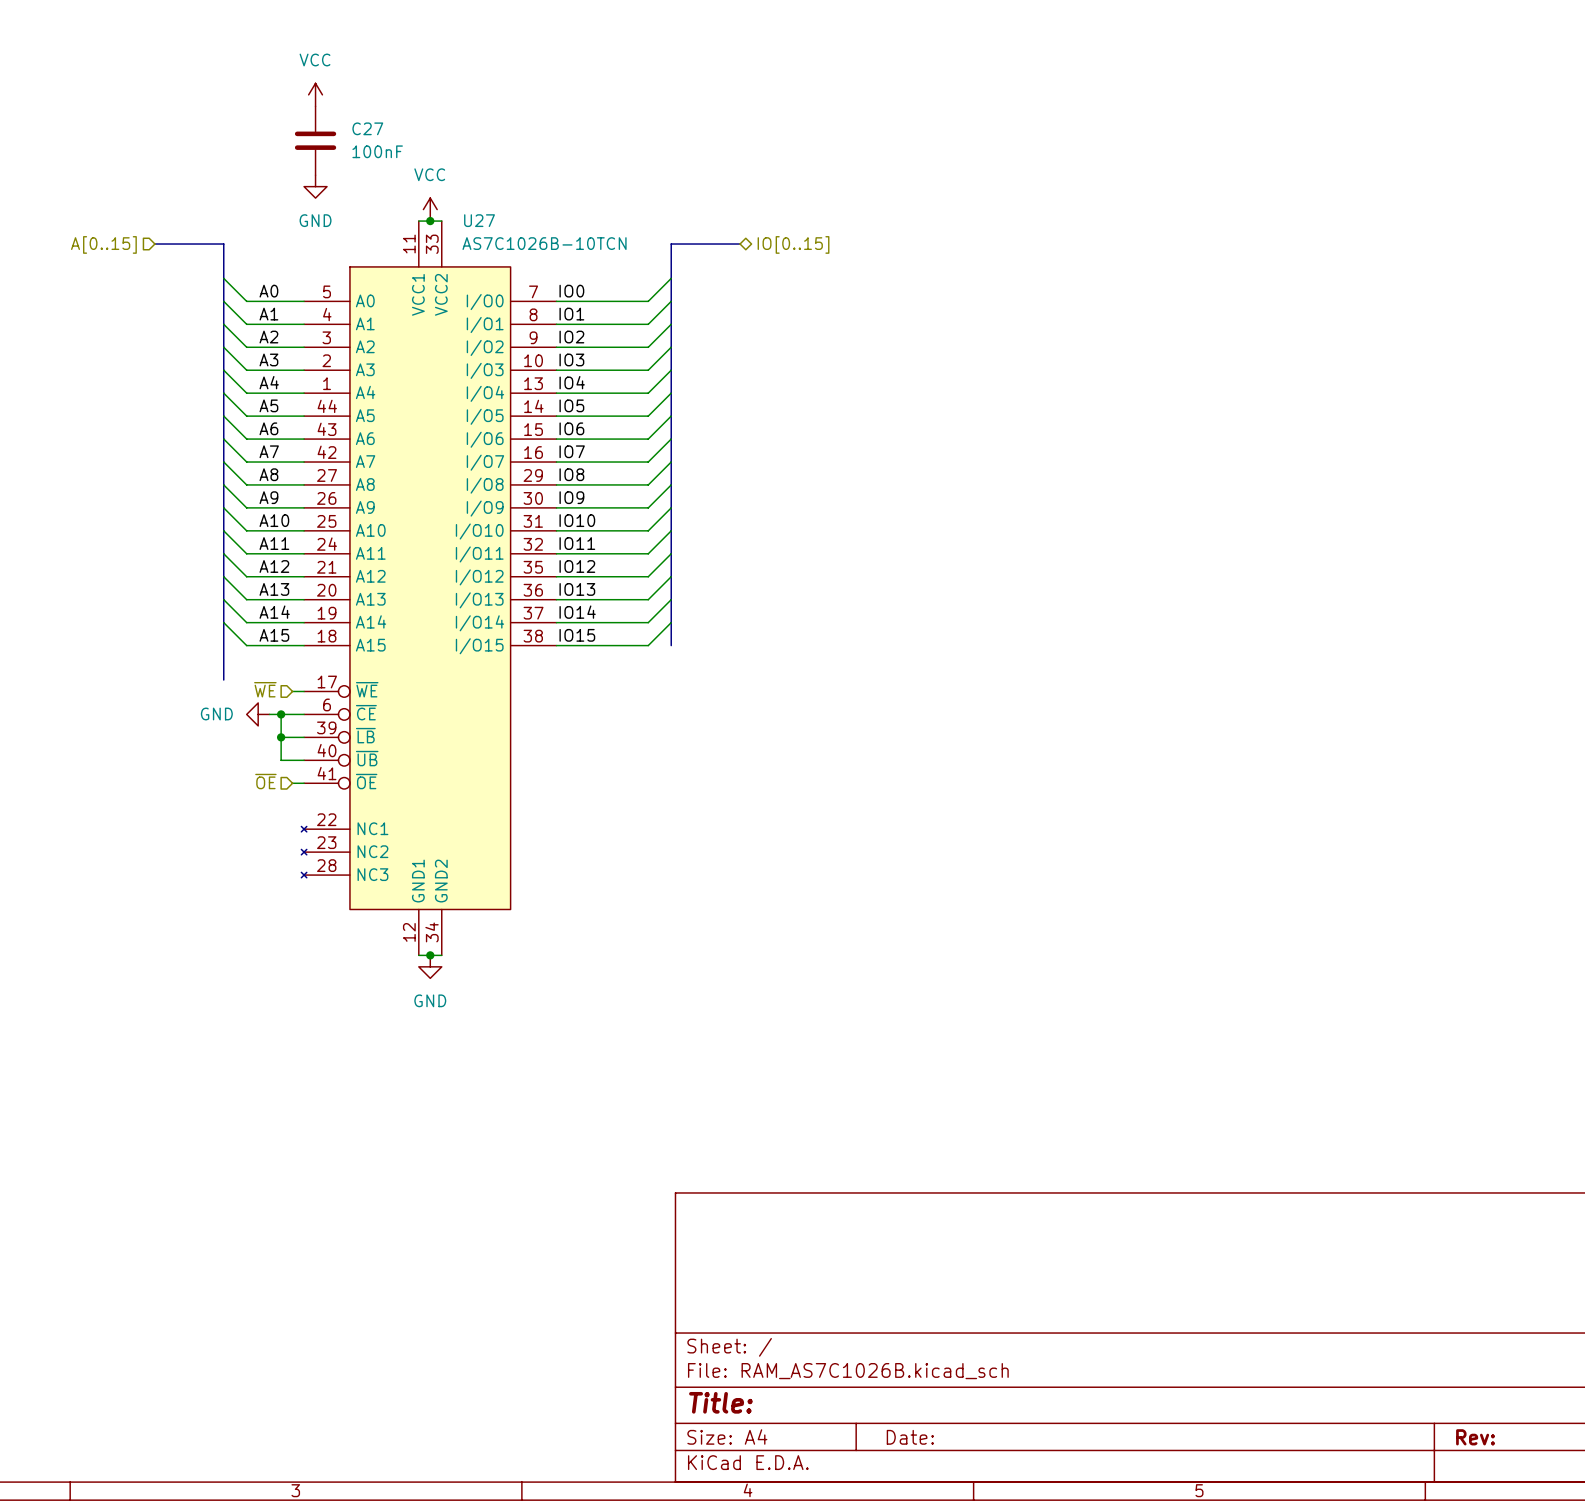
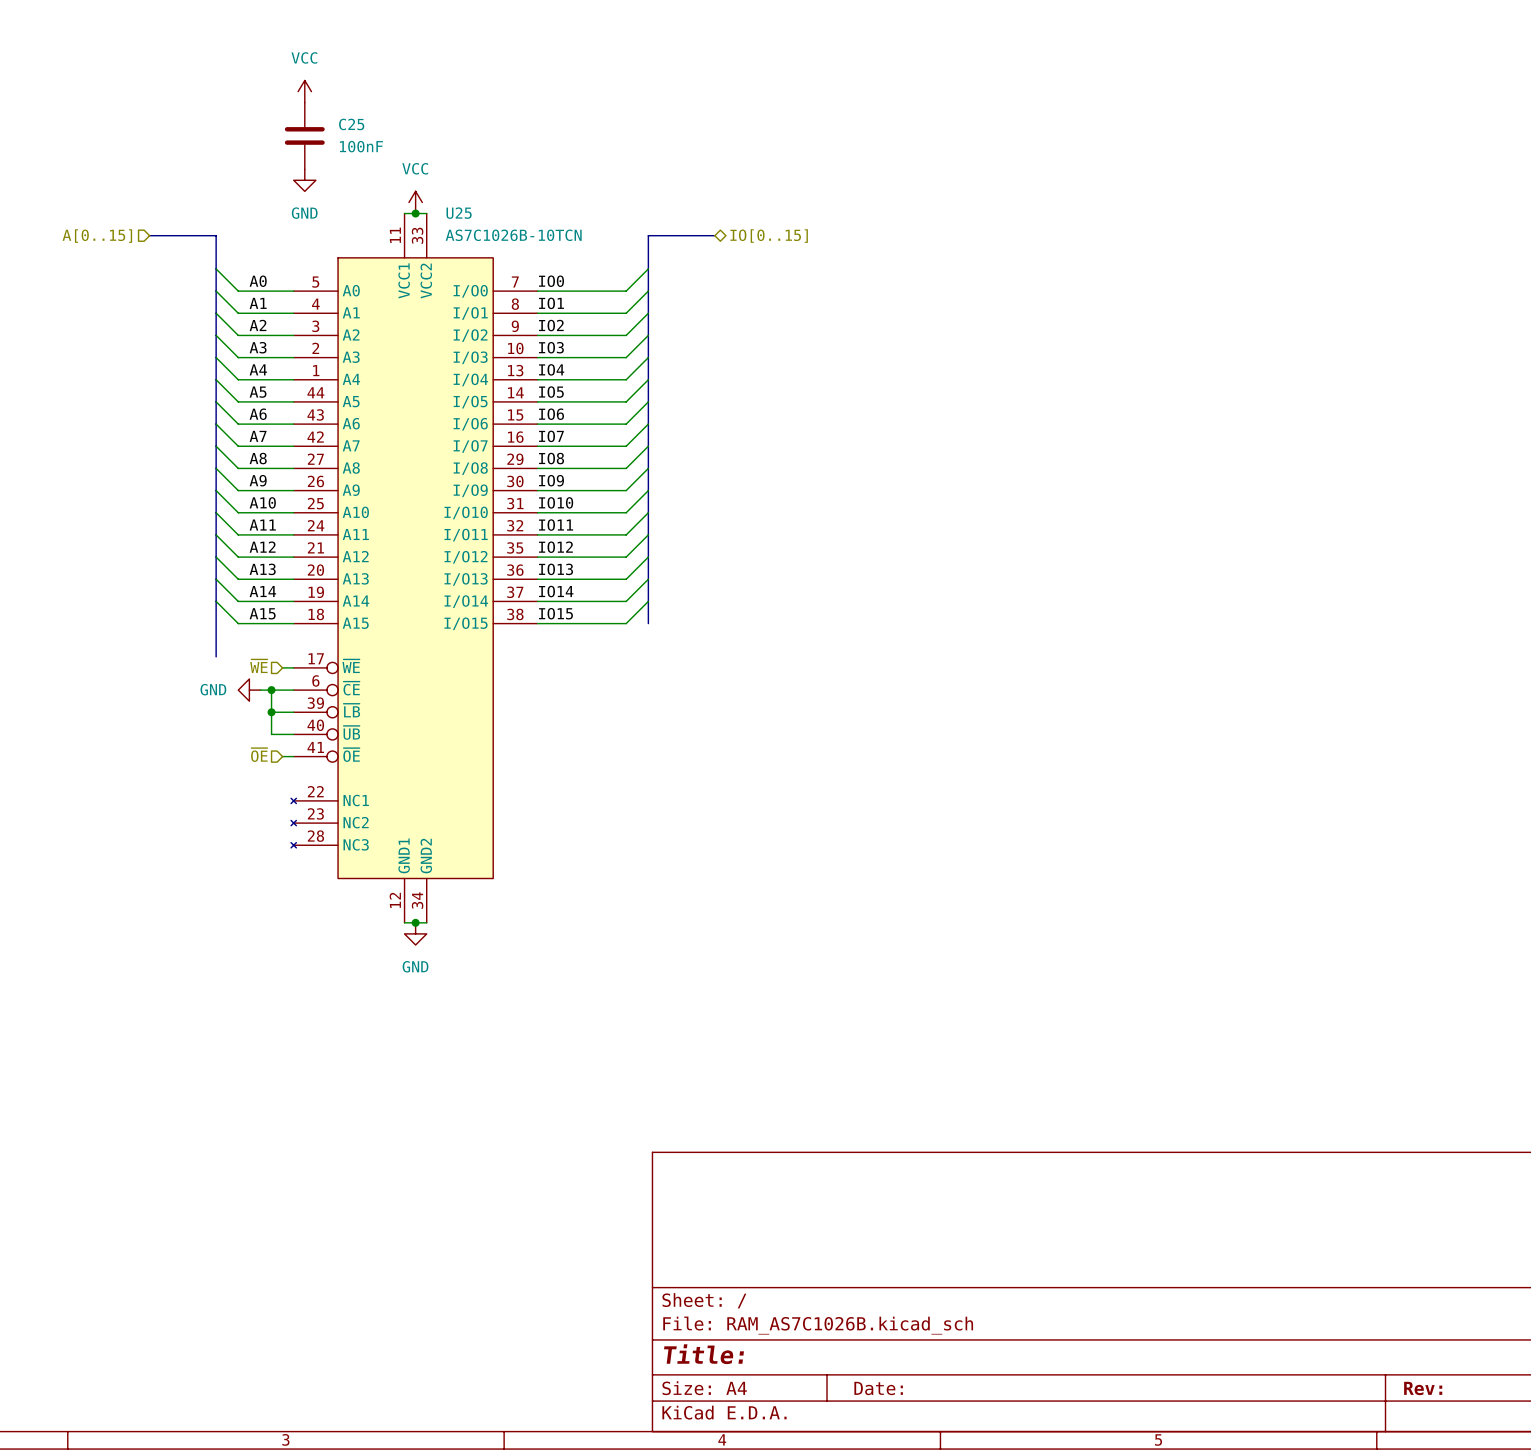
C27 name: C27 (367, 128) -> C25 (351, 124)
U27 name: U27 (479, 220) -> U25 (459, 213)

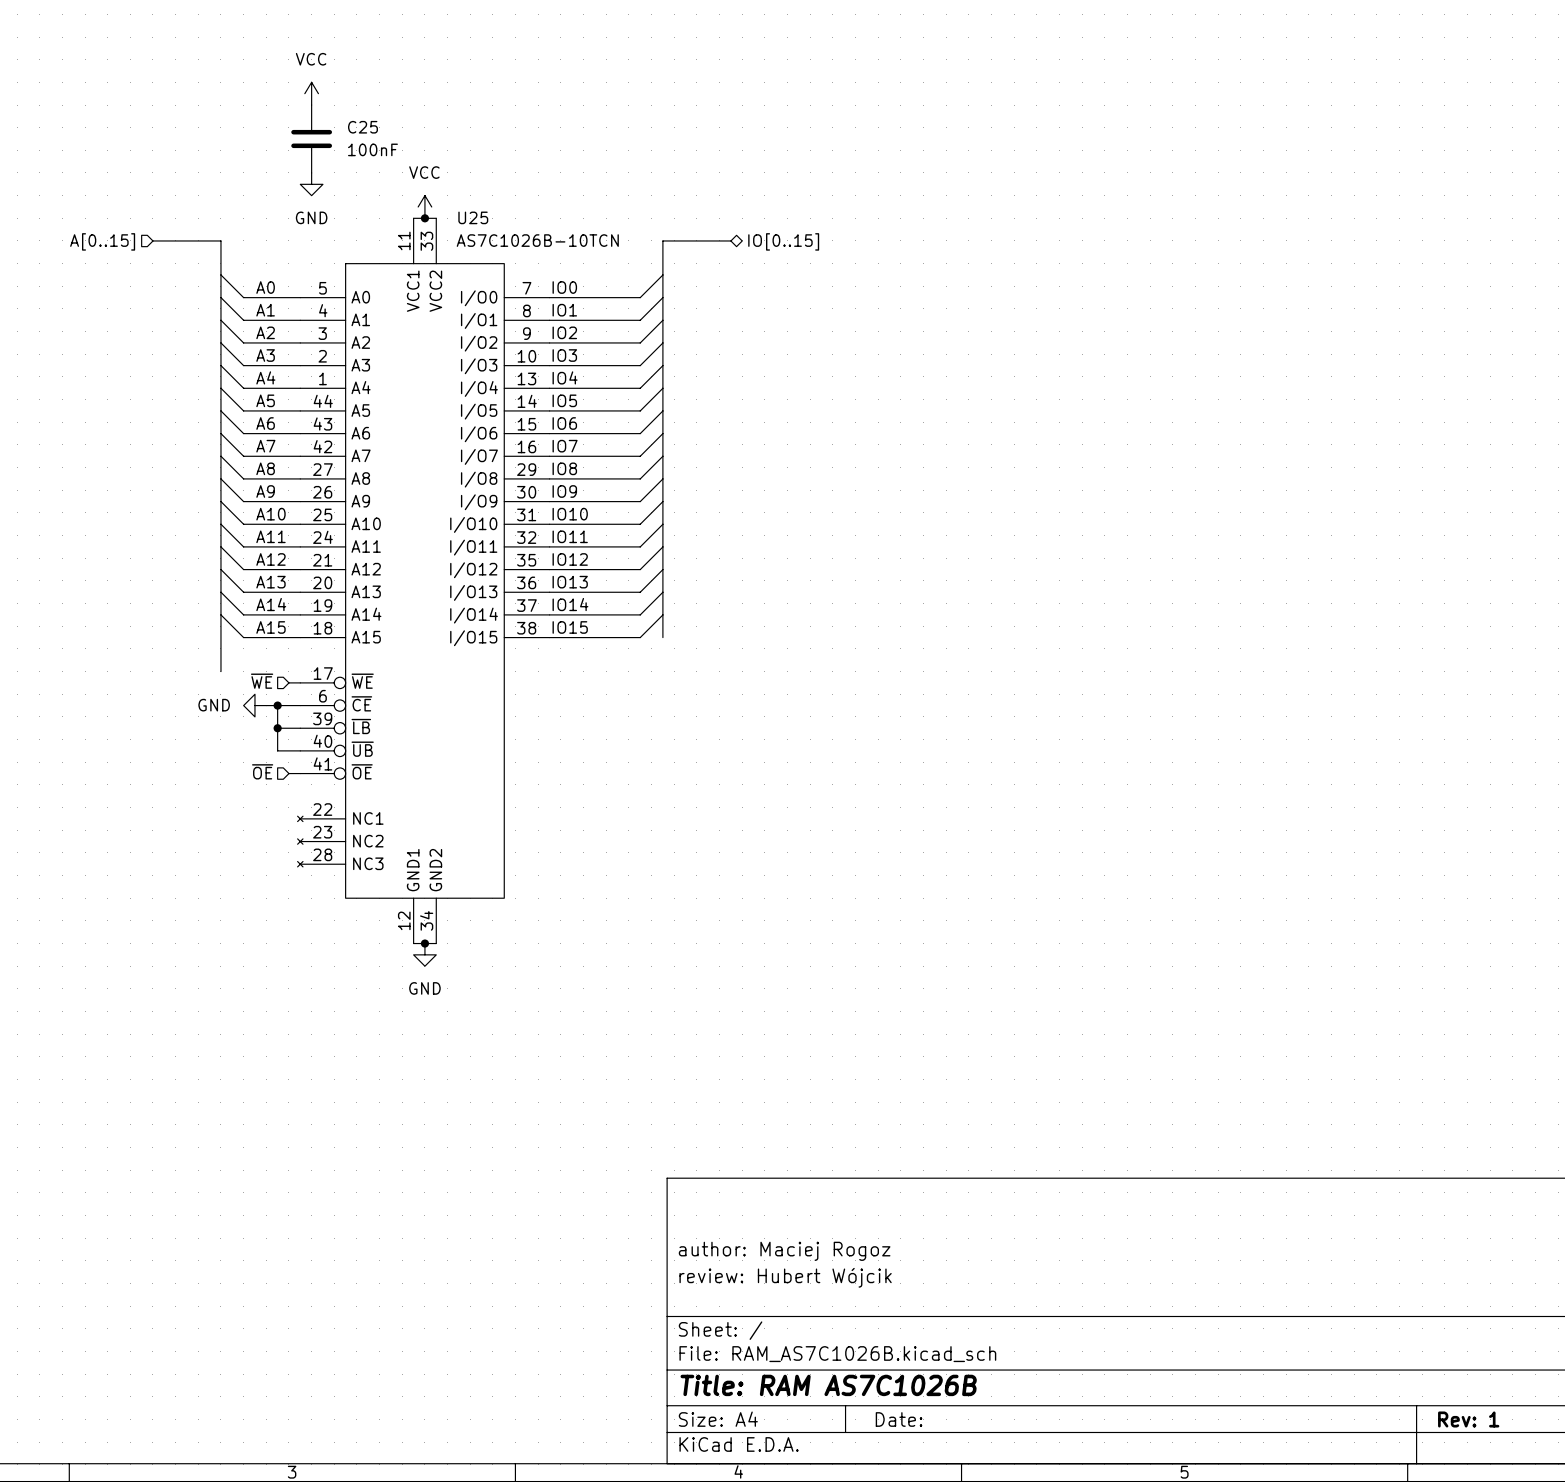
title block: none -> author: Maciej Rogoz (784, 1251)
title block: none -> review: Hubert Wójcik (785, 1277)
title block: Title: (704, 1354) -> Title: RAM AS7C1026B (828, 1385)
title block: Rev: (1423, 1388) -> Rev: 1 (1468, 1419)

